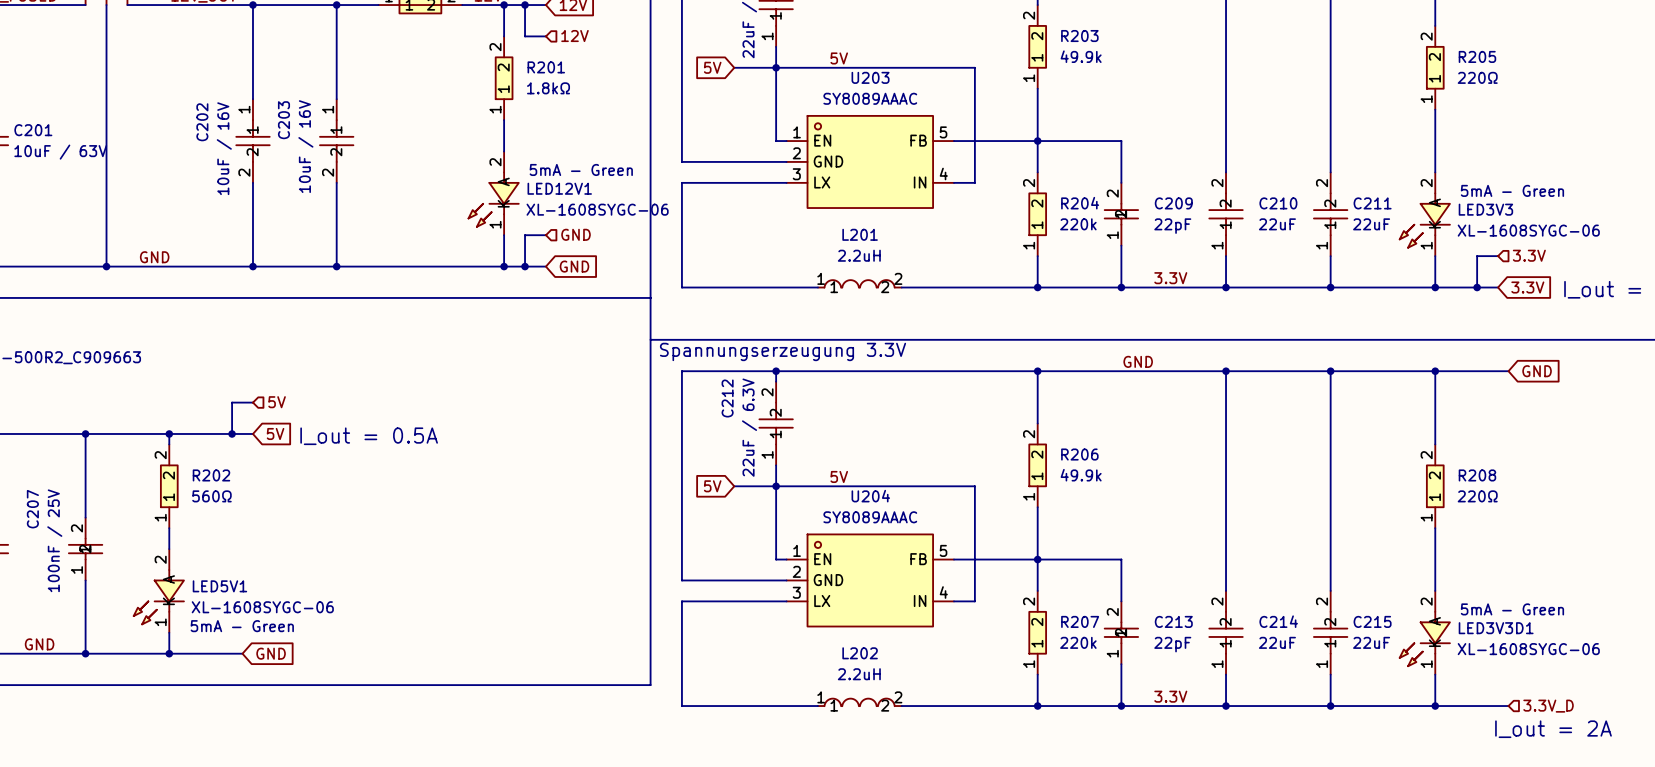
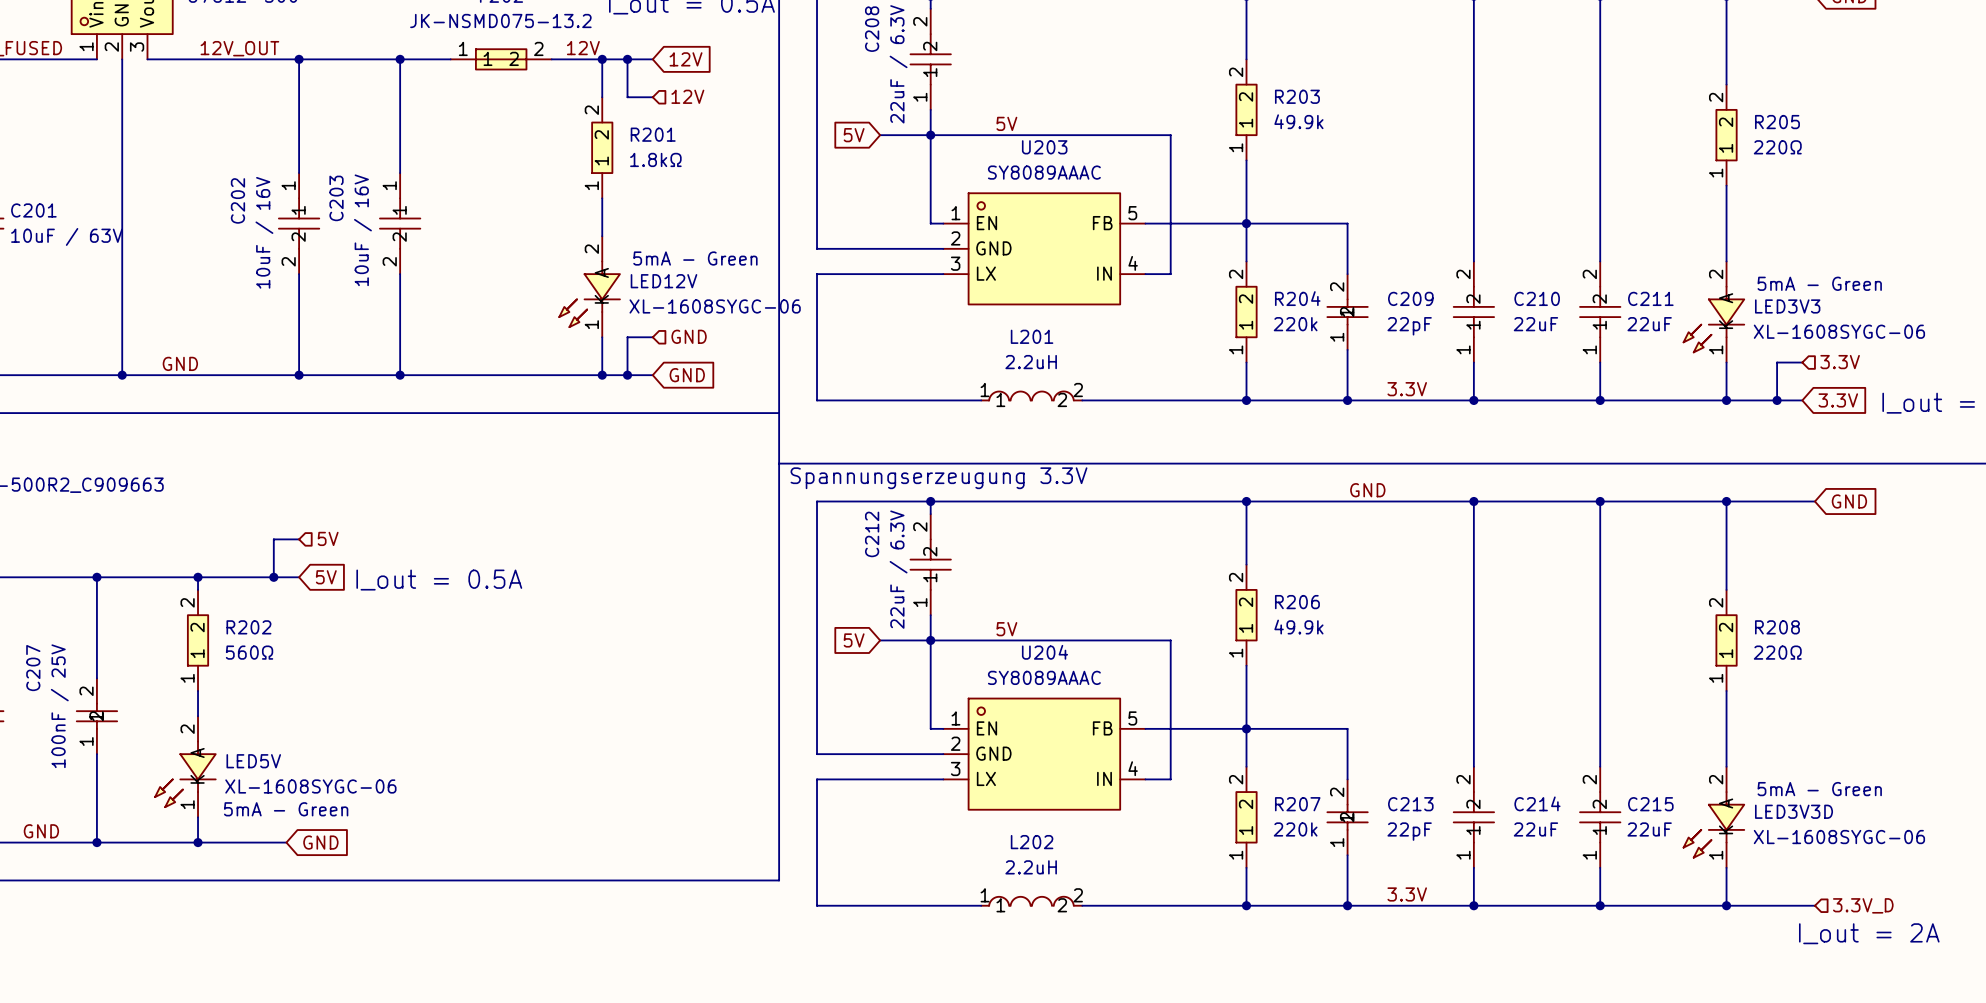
LED12V1 name: LED12V1 (559, 188) -> LED12V (664, 281)
LED5V1 name: LED5V1 (219, 586) -> LED5V (253, 761)
LED3V3D1 name: LED3V3D1 (1496, 628) -> LED3V3D (1794, 811)

